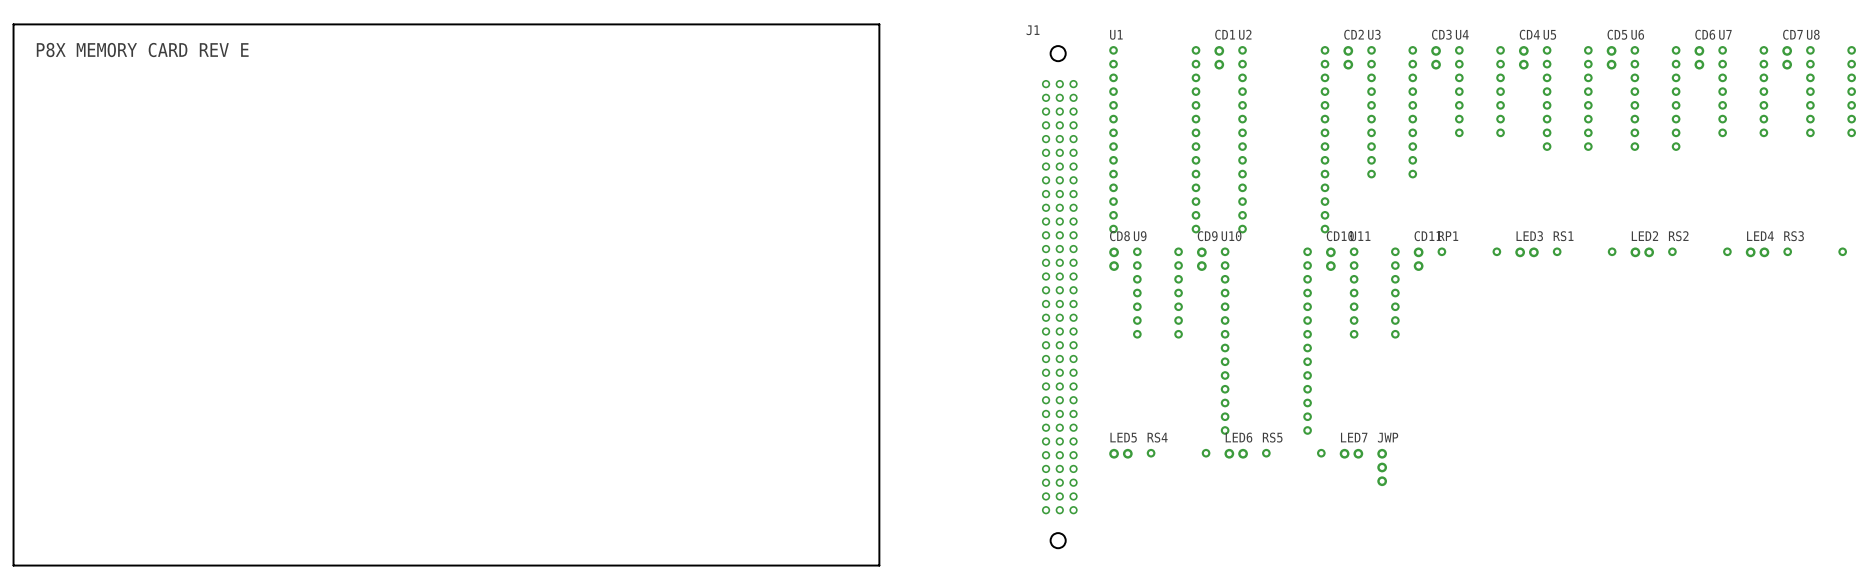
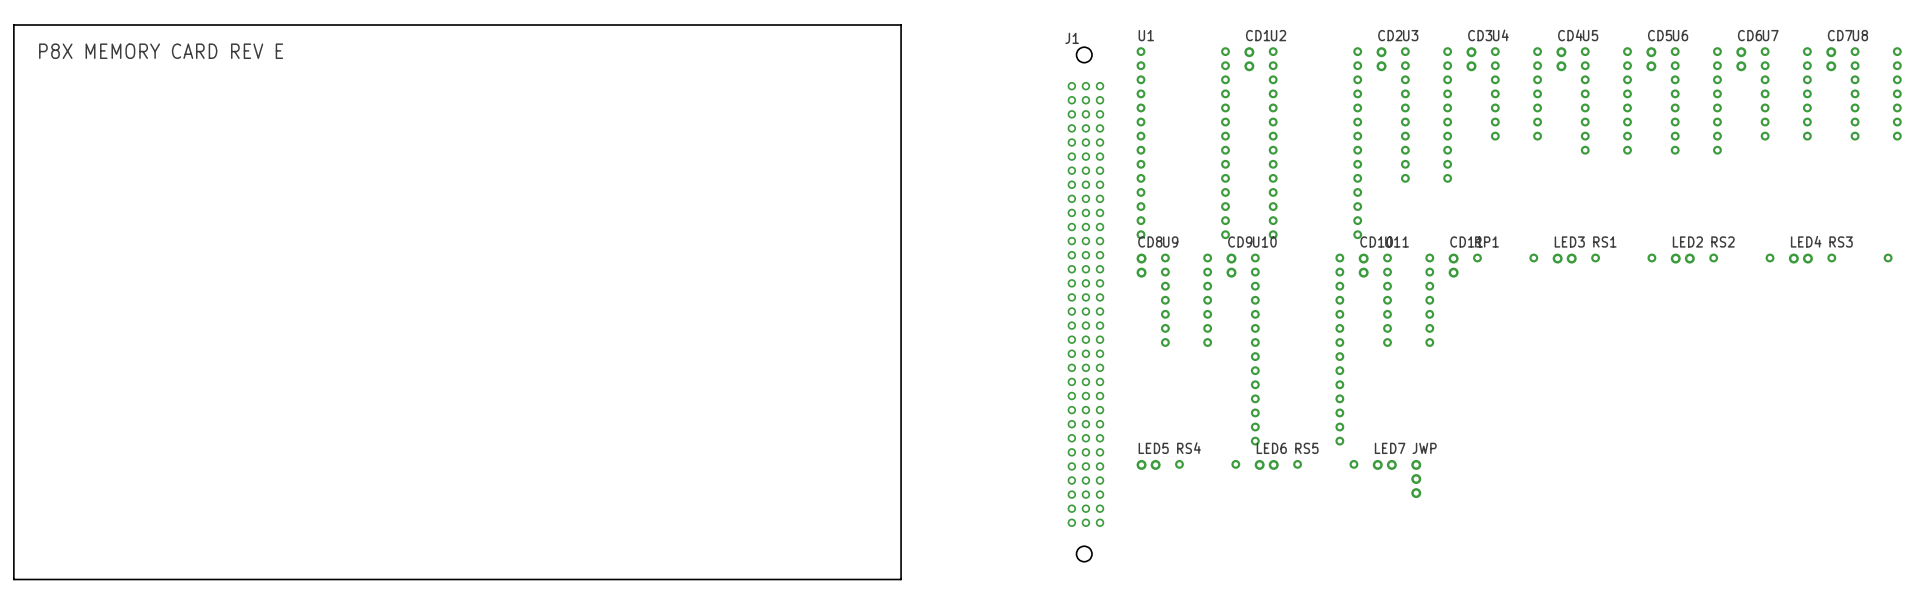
J1 name position: J1 (1033, 30) -> J1 (1072, 38)

